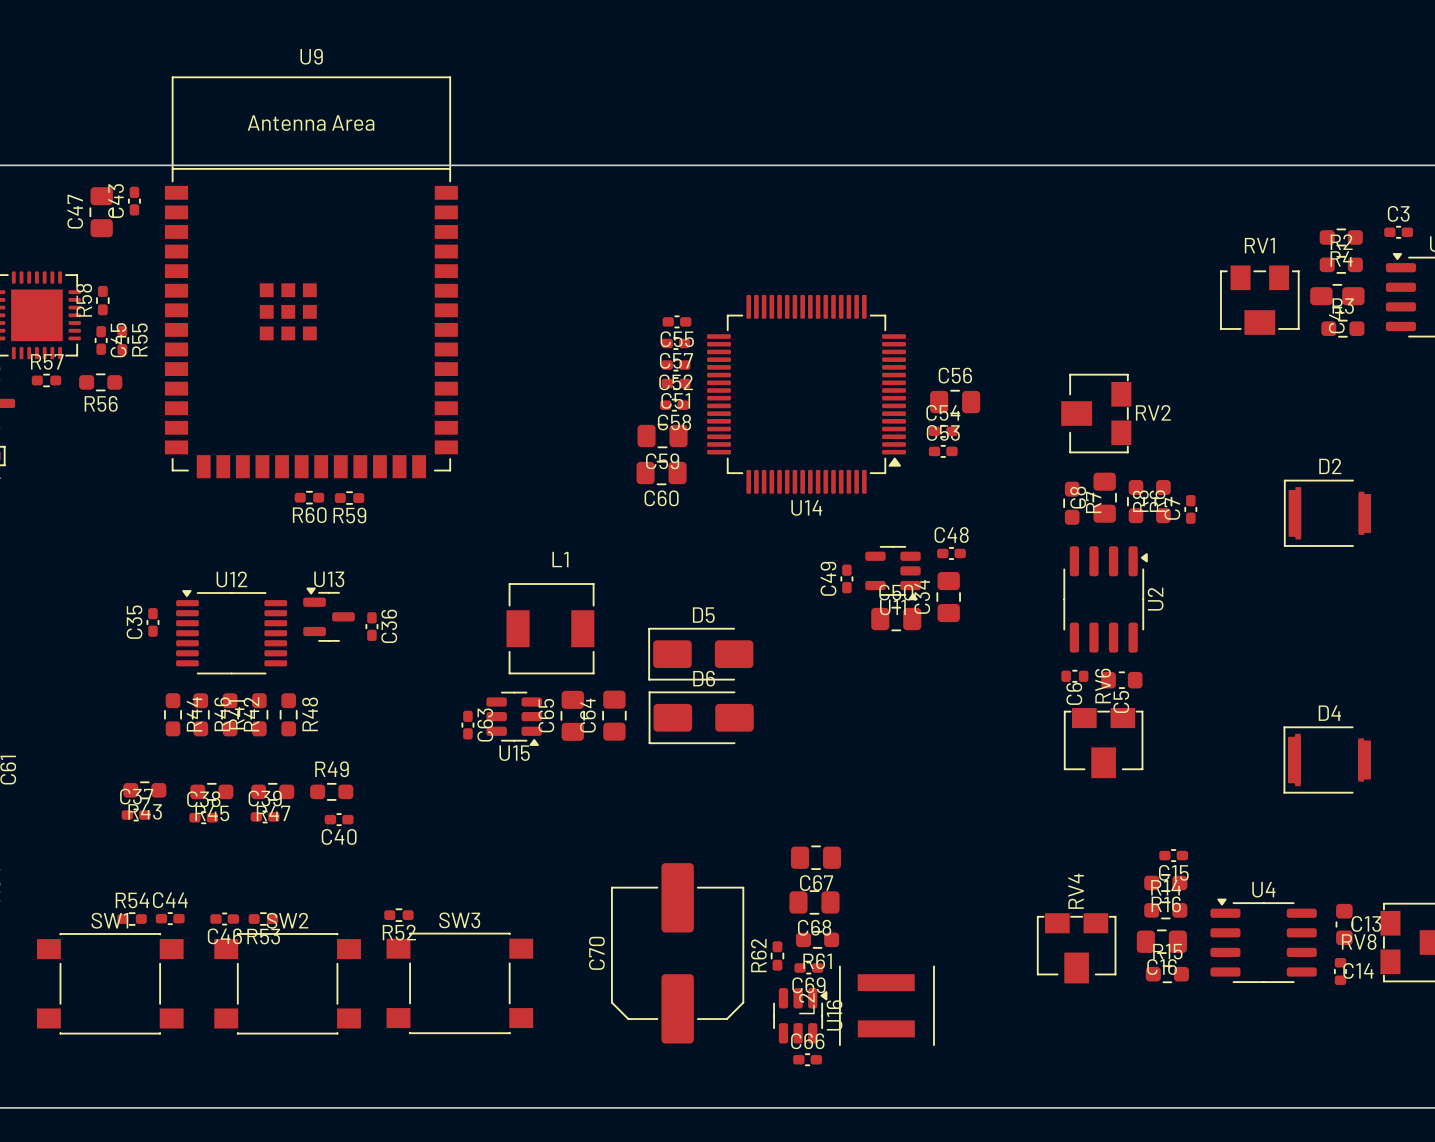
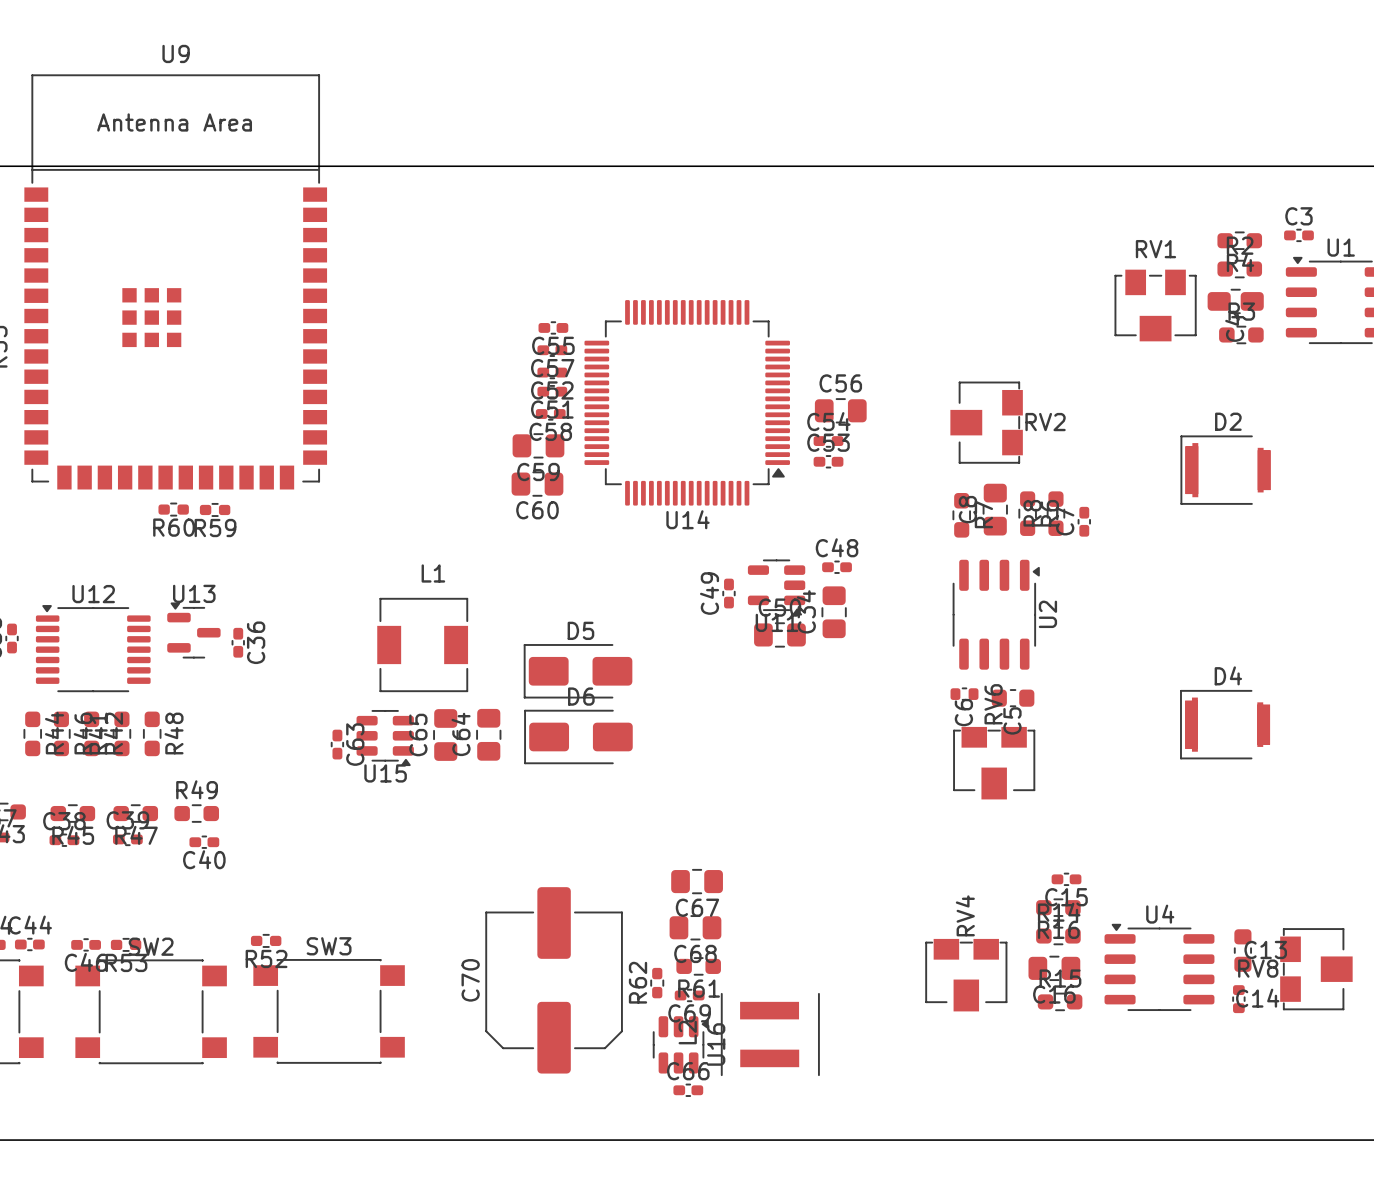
D2 position: (1327, 513) -> (1225, 470)
D4 position: (1327, 760) -> (1225, 724)

